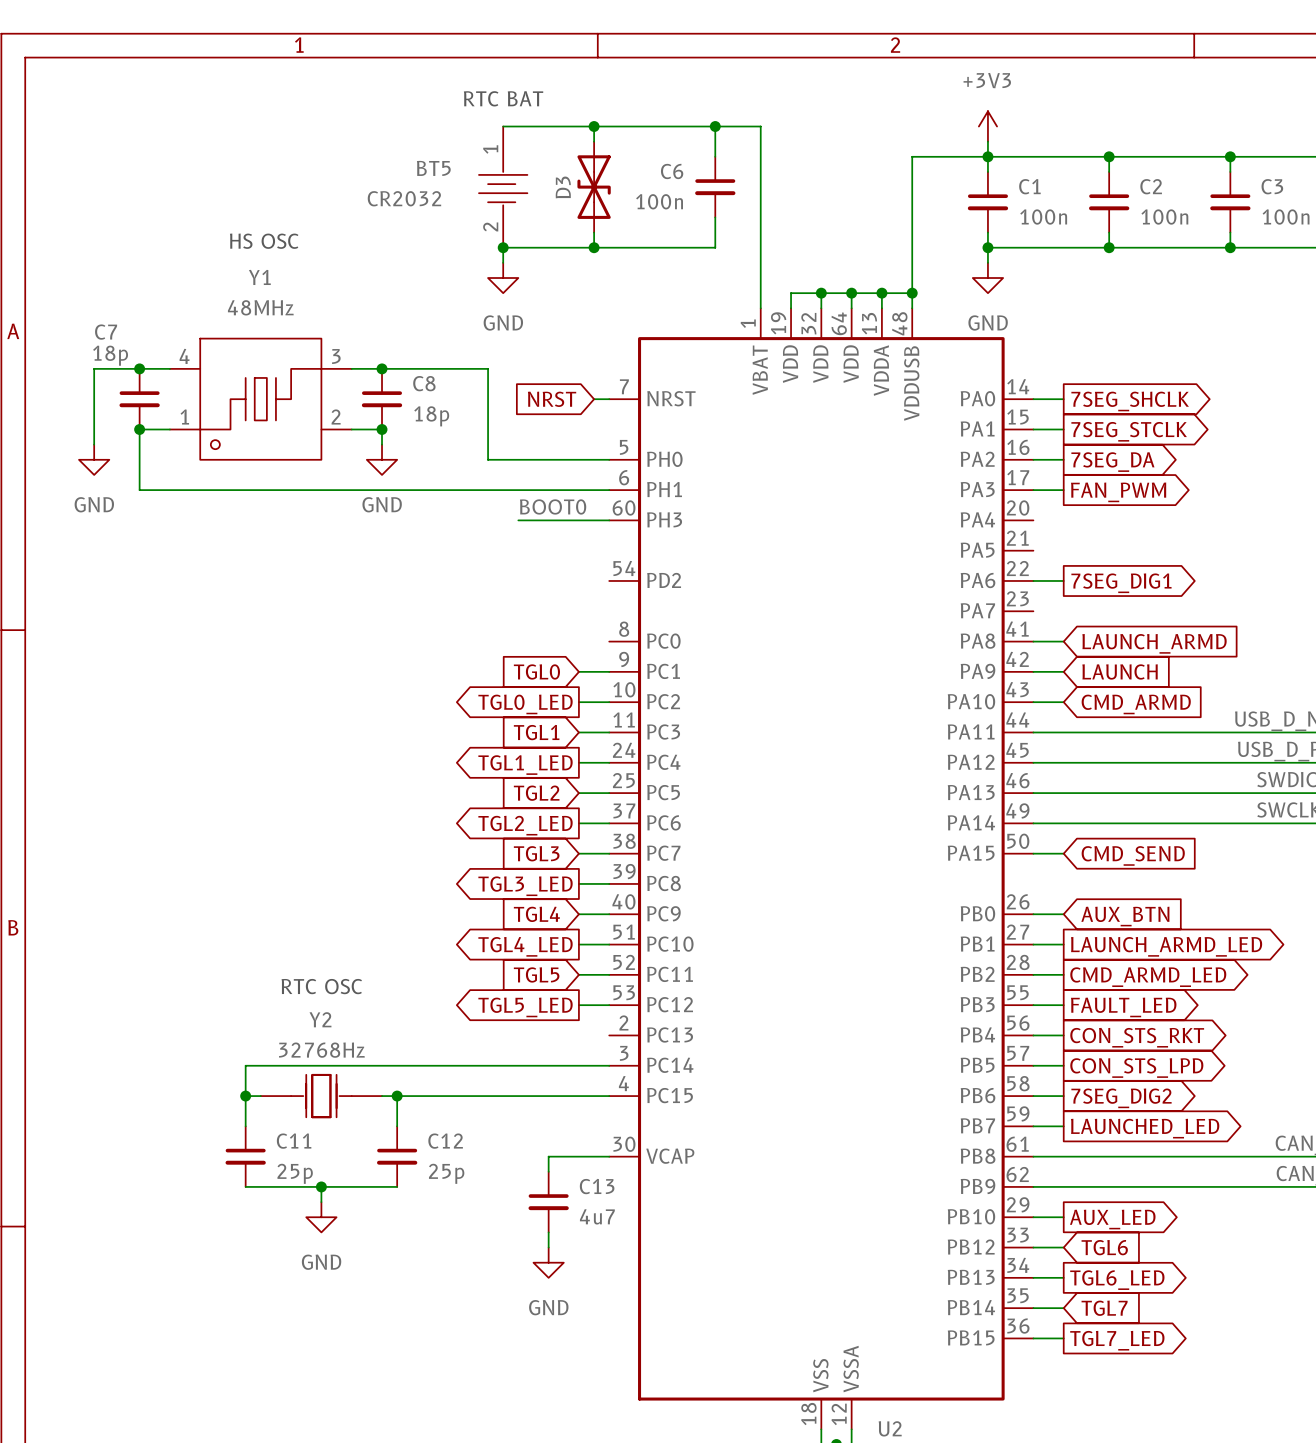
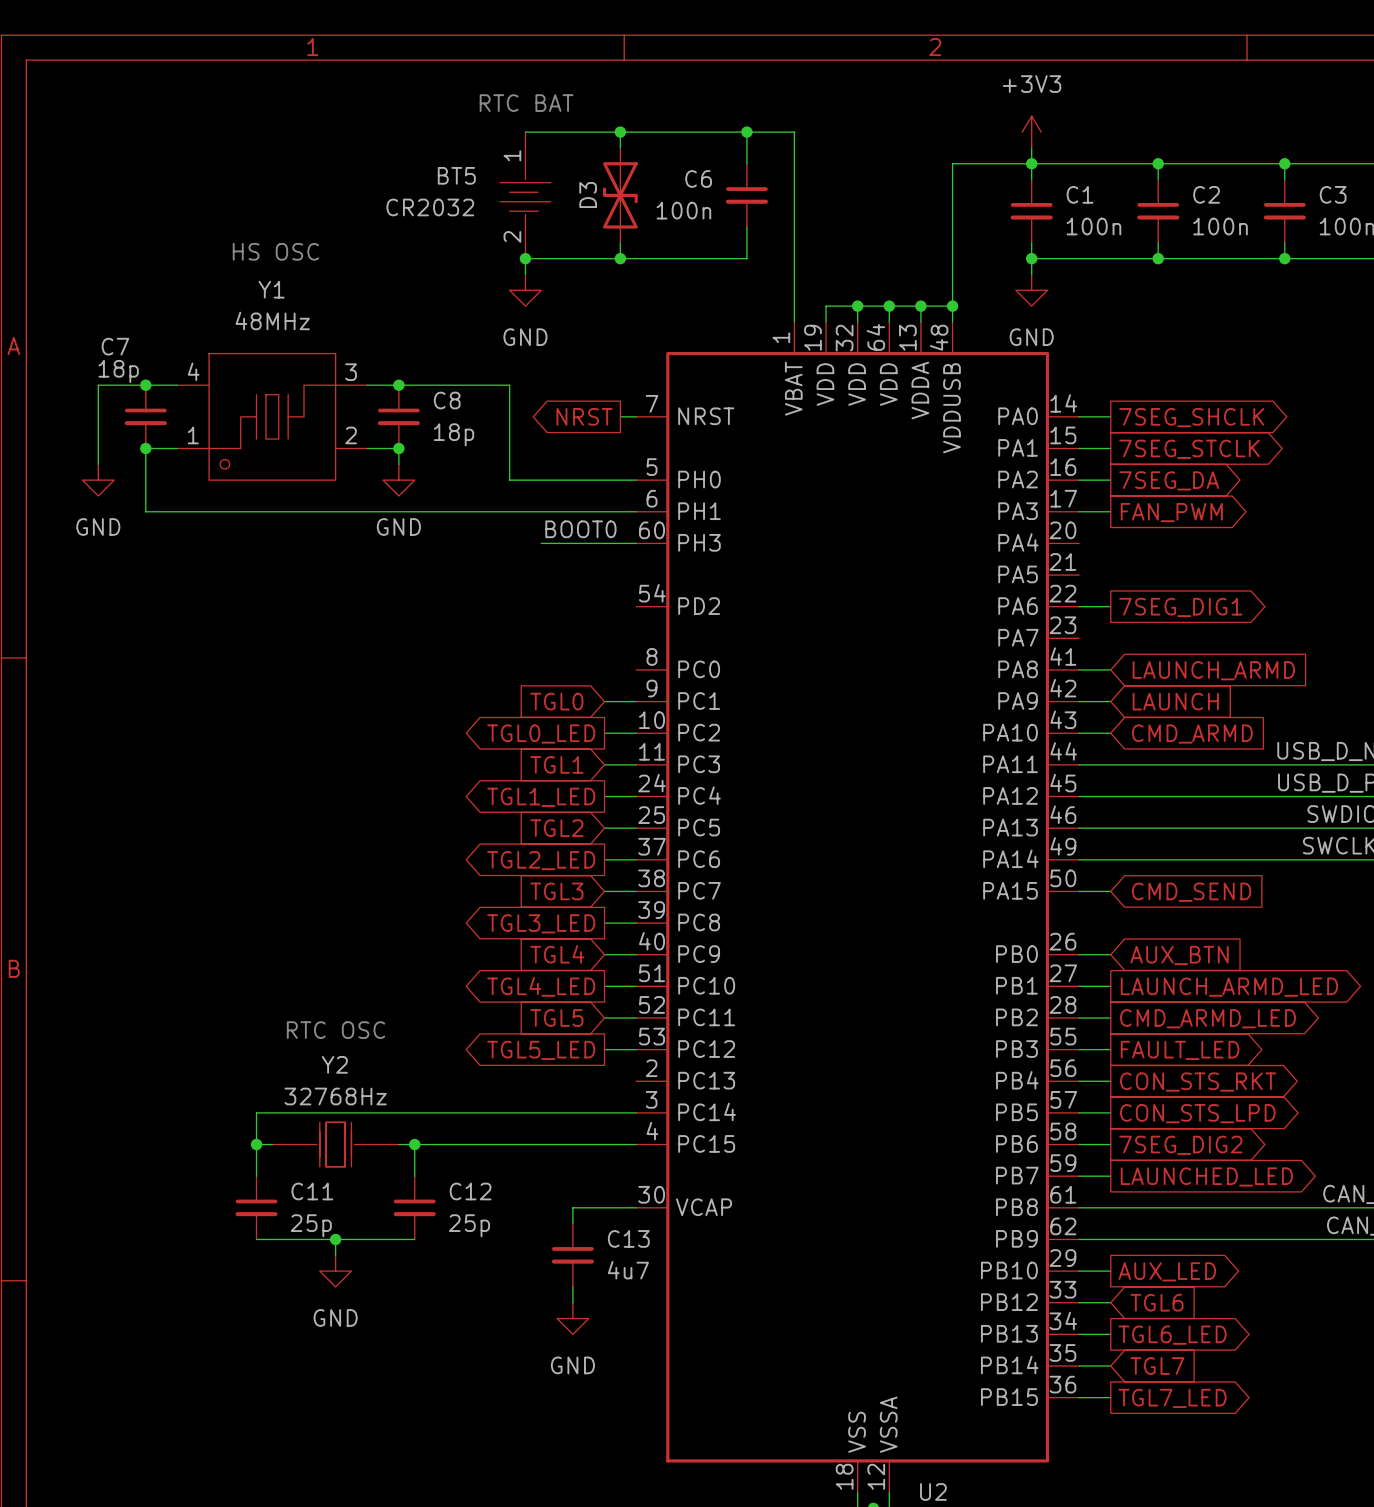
global label shape: input (552, 399) -> output (584, 416)

